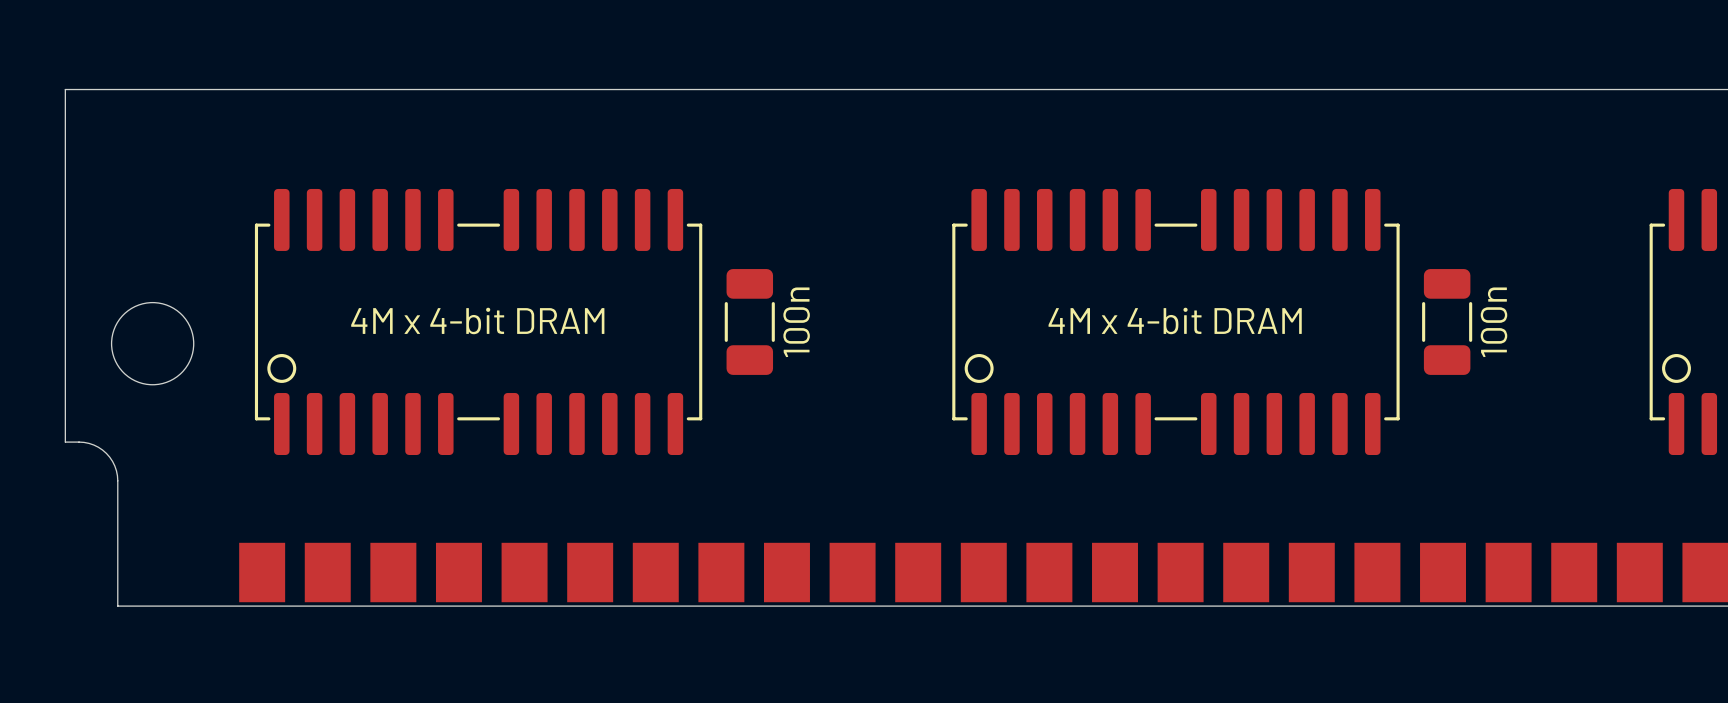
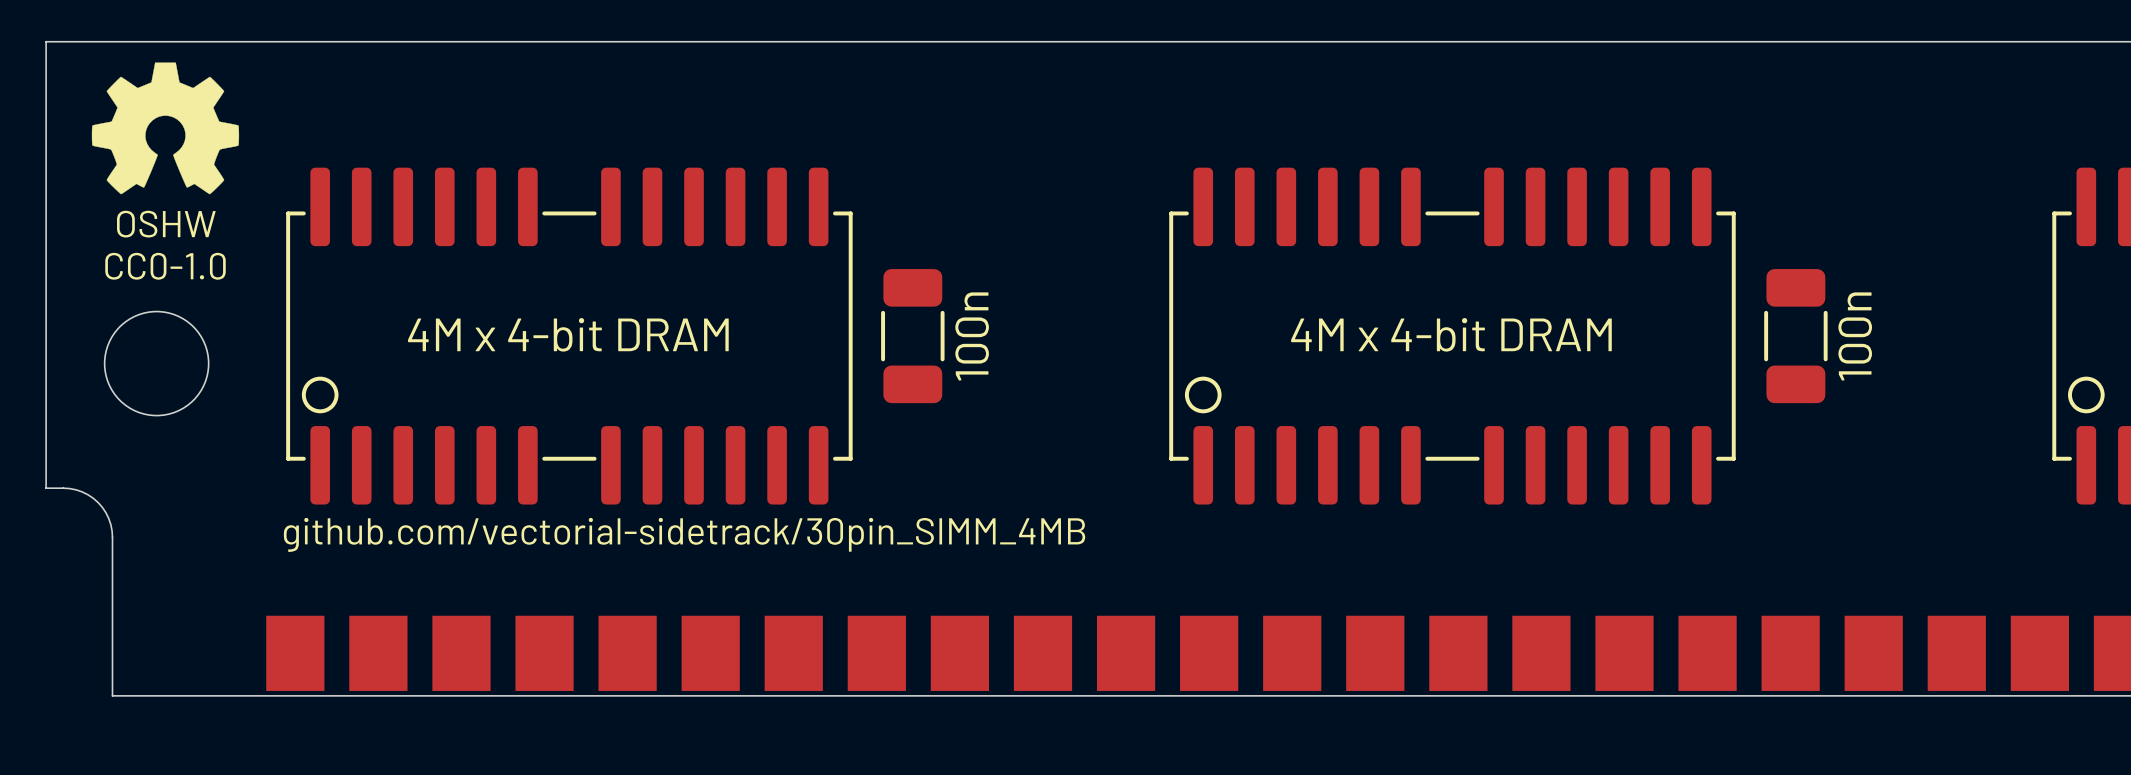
drawing: none -> [91, 62, 240, 195]
text: none -> OSHW (166, 224)
text: none -> CC0-1.0 (165, 266)
text: none -> github.com/vectorial-sidetrack/30pin_SIMM_4MB (684, 534)

